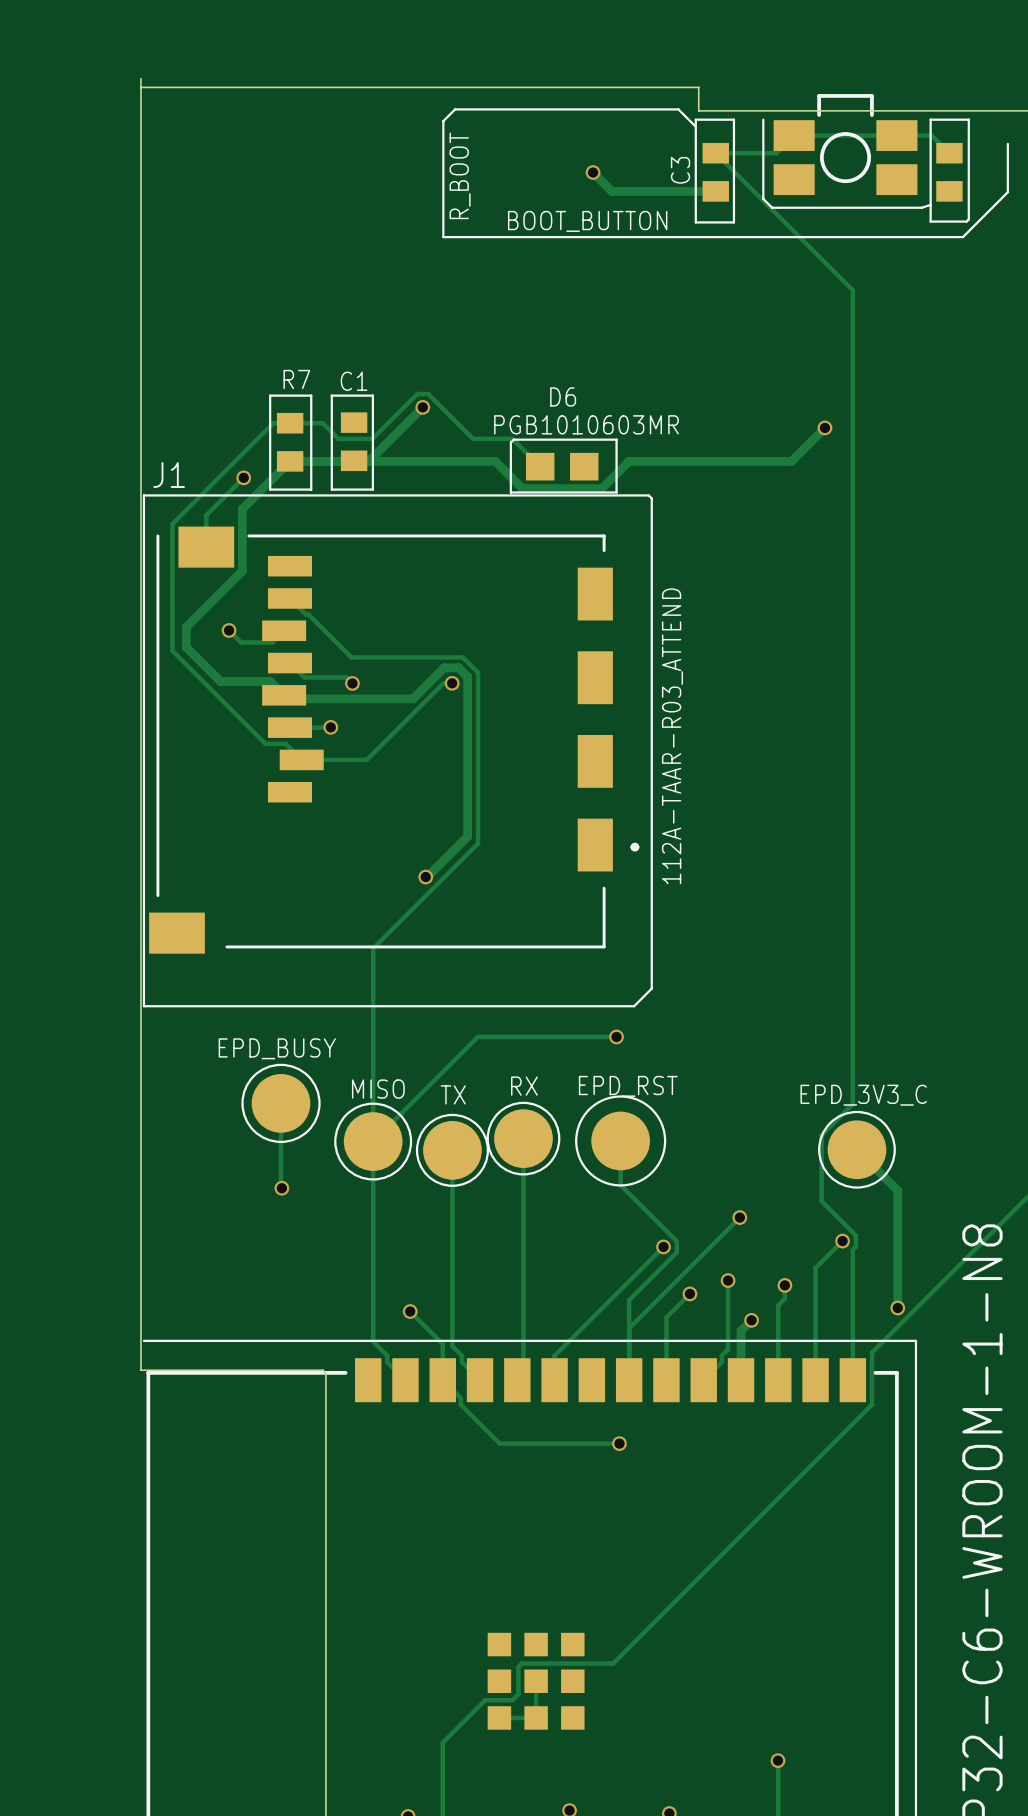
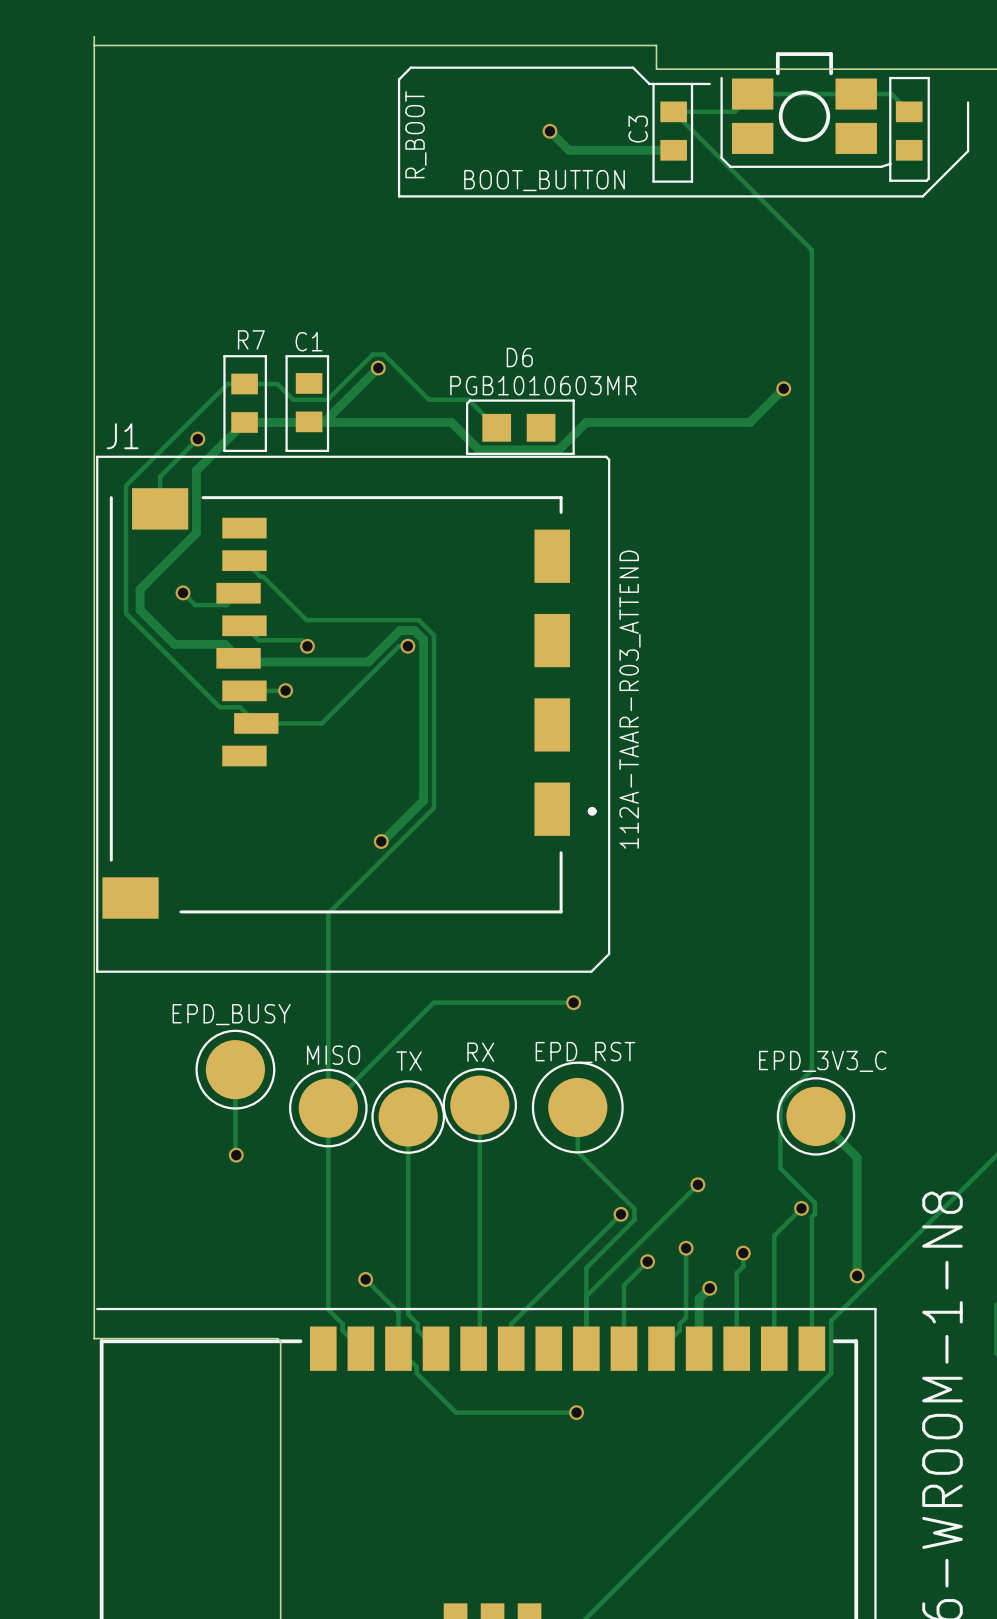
line: (675, 109) (678, 109) (694, 125) -> (633, 67) (649, 83) (709, 83)
line: (695, 125) (695, 119) (733, 119) (733, 125) -> none

